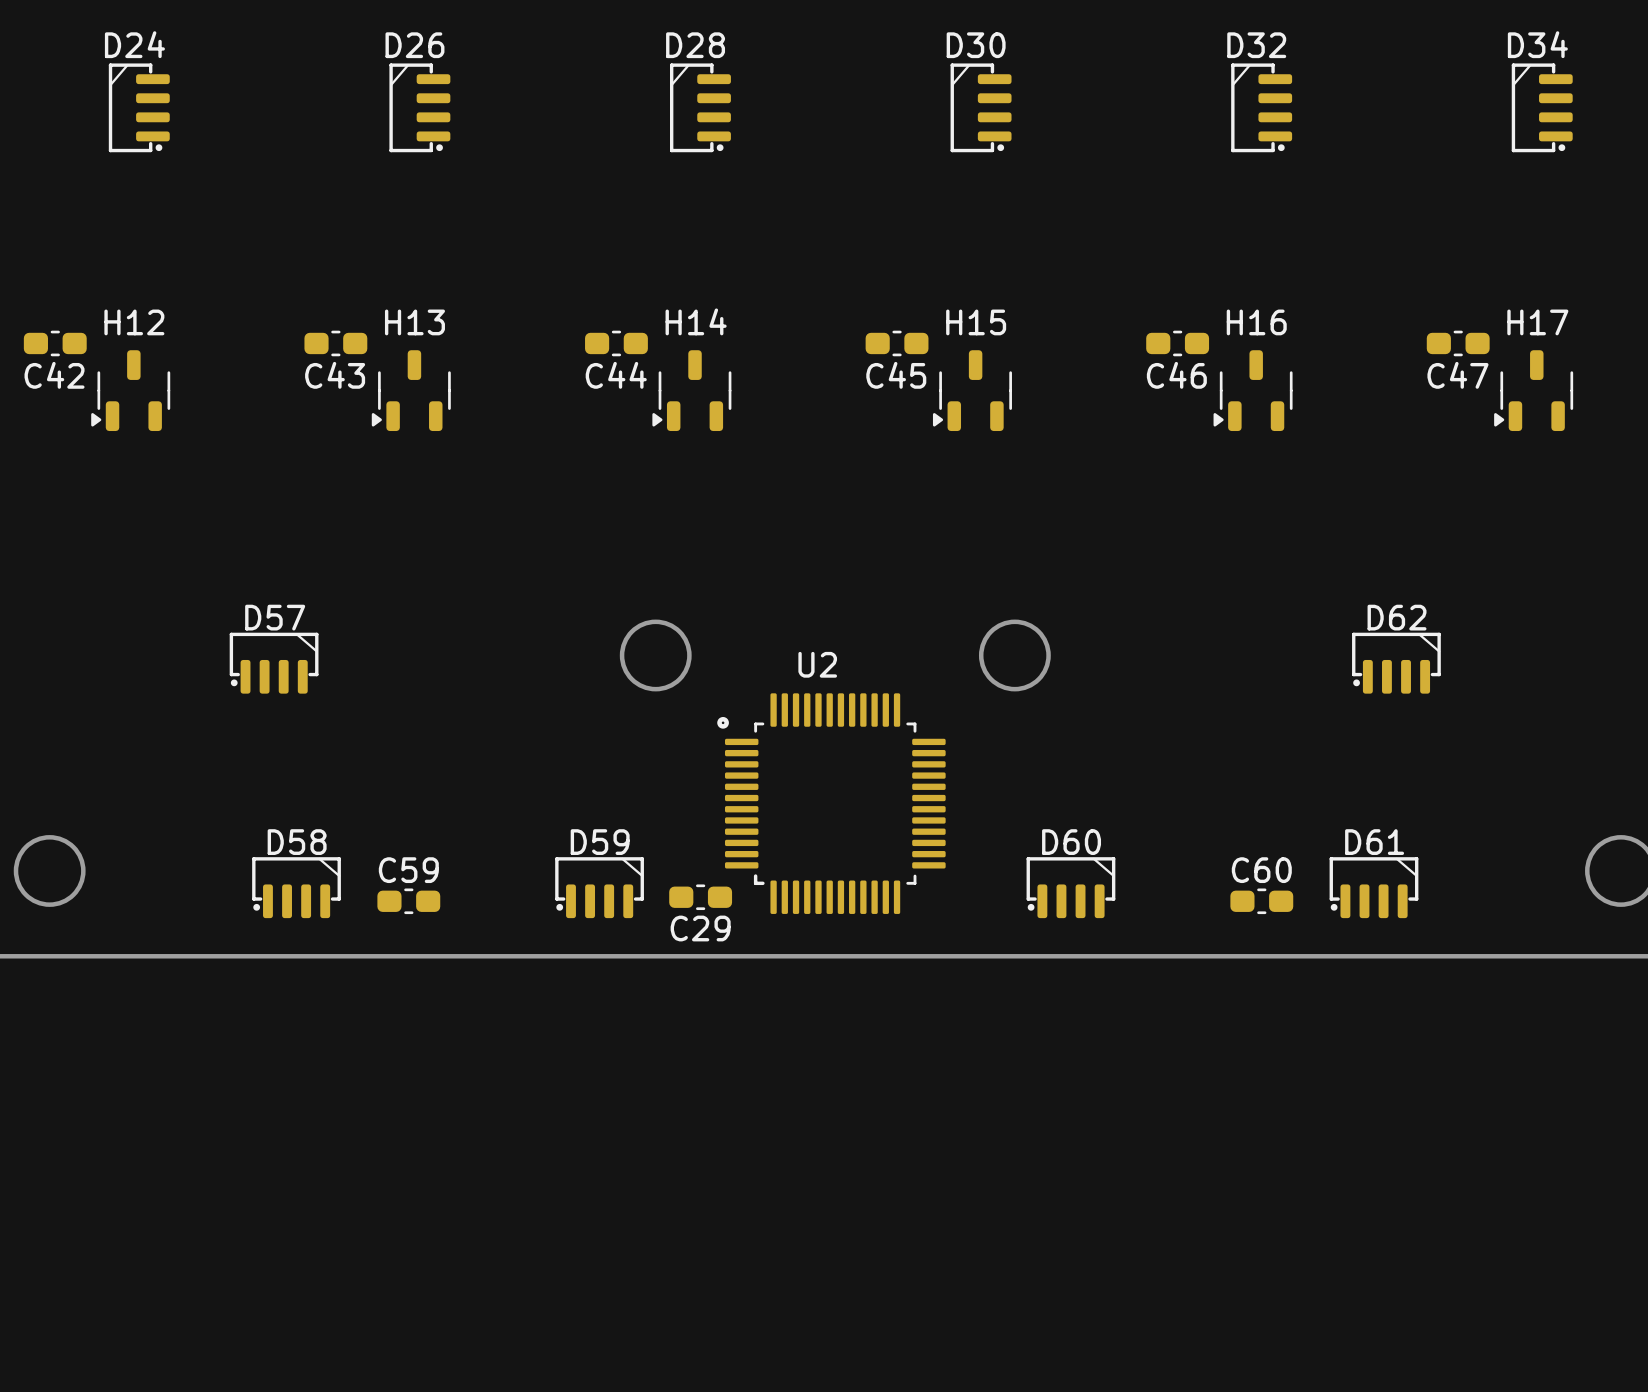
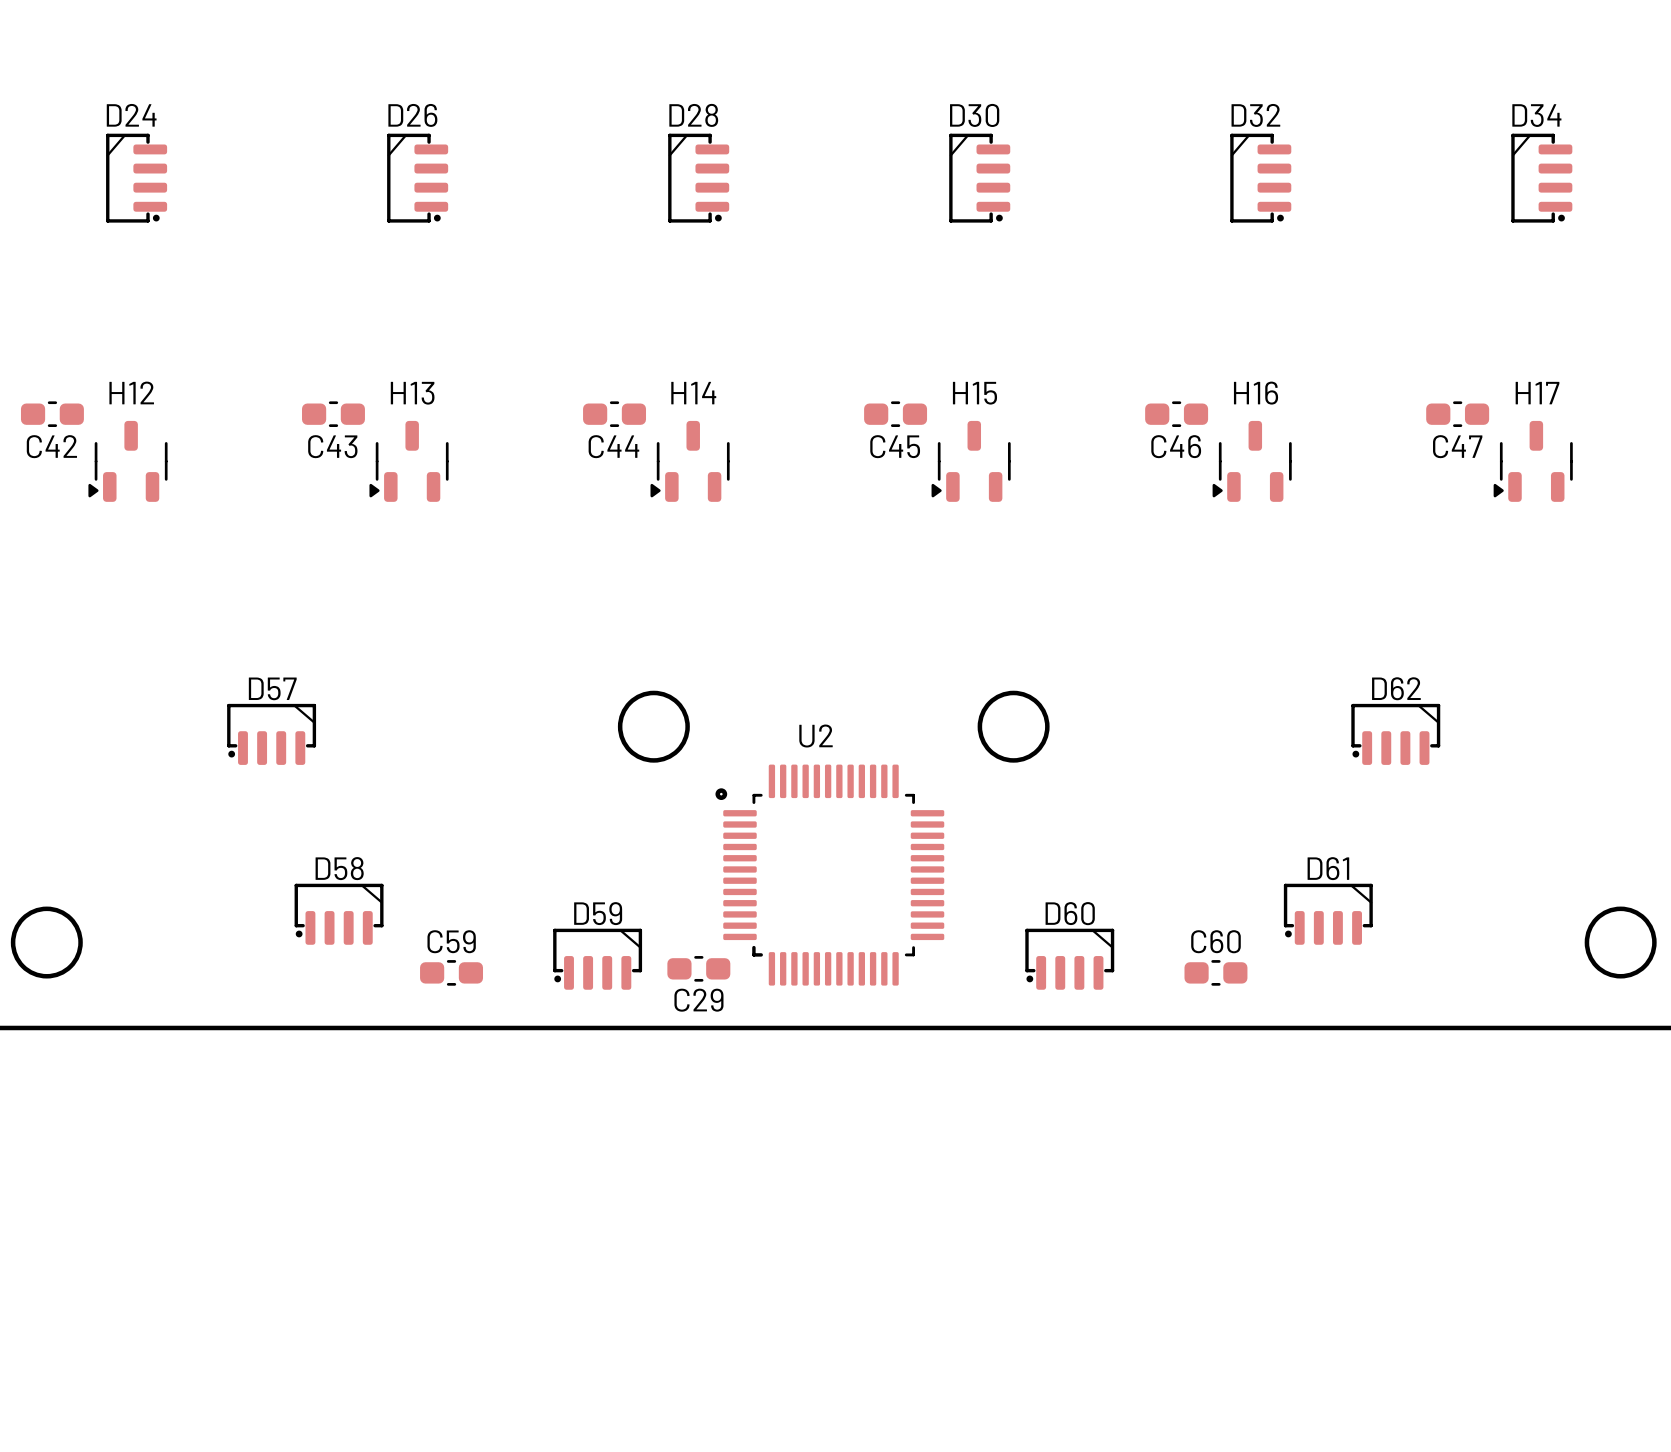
D58 position: (296, 887) -> (339, 914)
D61 position: (1373, 887) -> (1328, 914)
C59 position: (408, 901) -> (451, 972)
C60 position: (1261, 901) -> (1215, 972)

